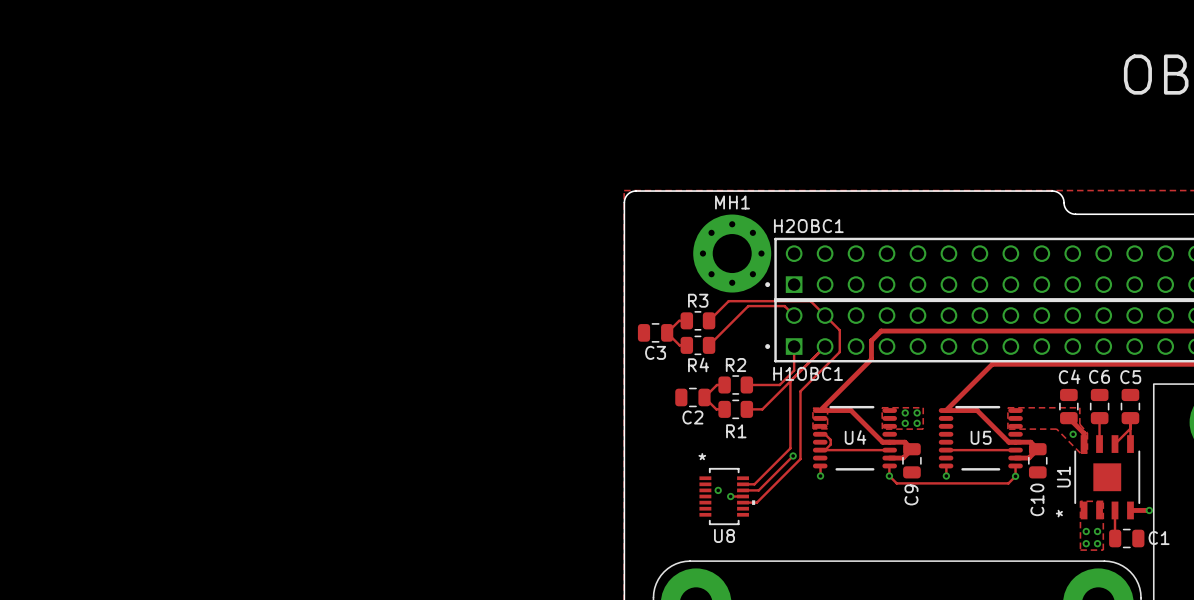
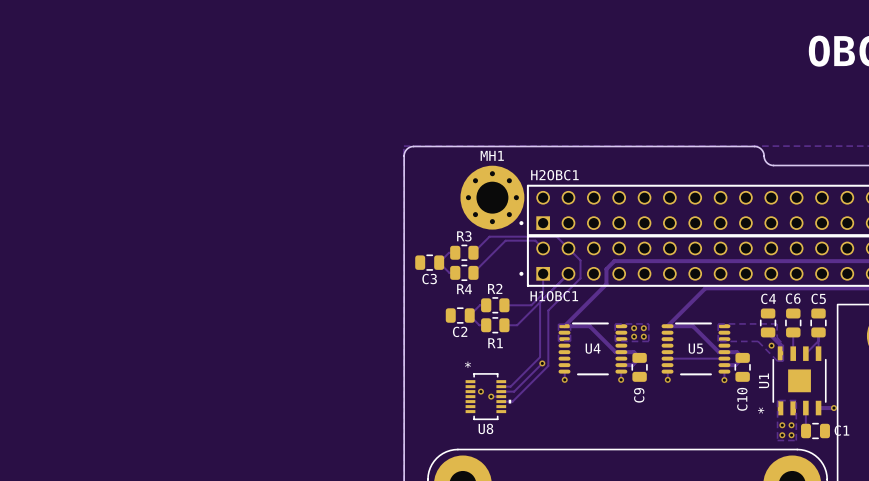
track: (820, 434) (825, 434) (830, 439) (830, 444) (825, 450) -> none
track: (820, 450) (889, 450) -> none
track: (889, 476) (896, 483) (1008, 483) (1015, 476) -> none

